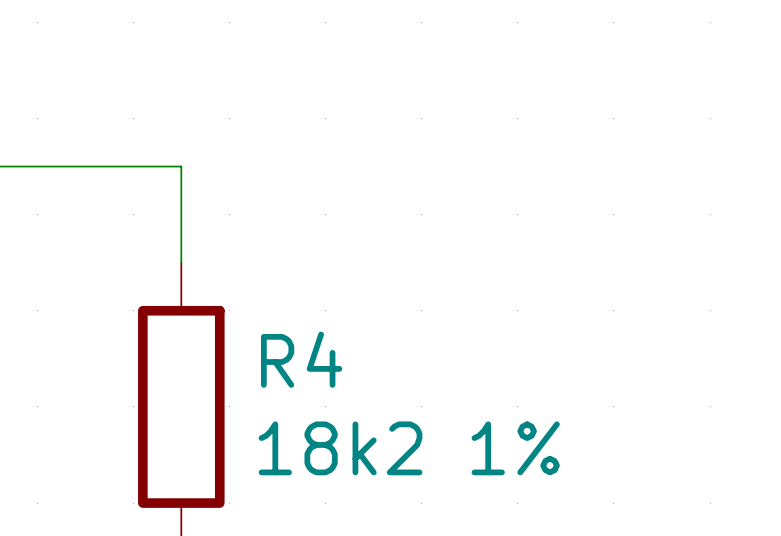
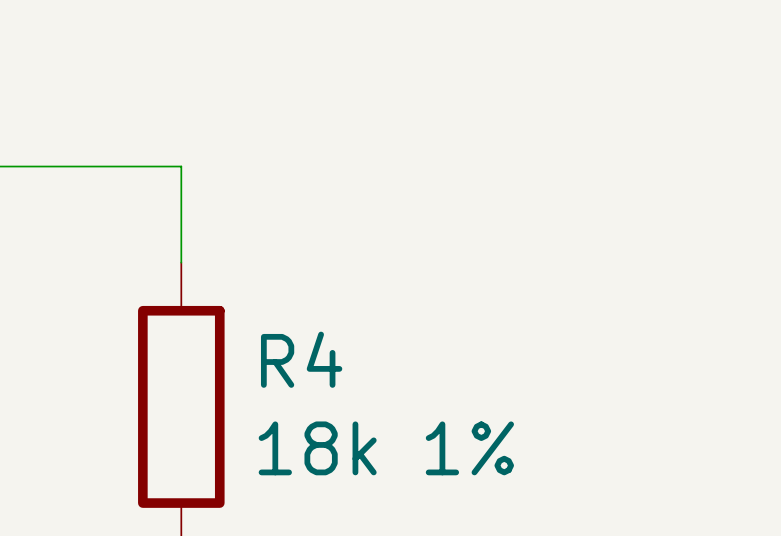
R4 value: 18k2 1% (409, 448) -> 18k 1% (386, 448)

